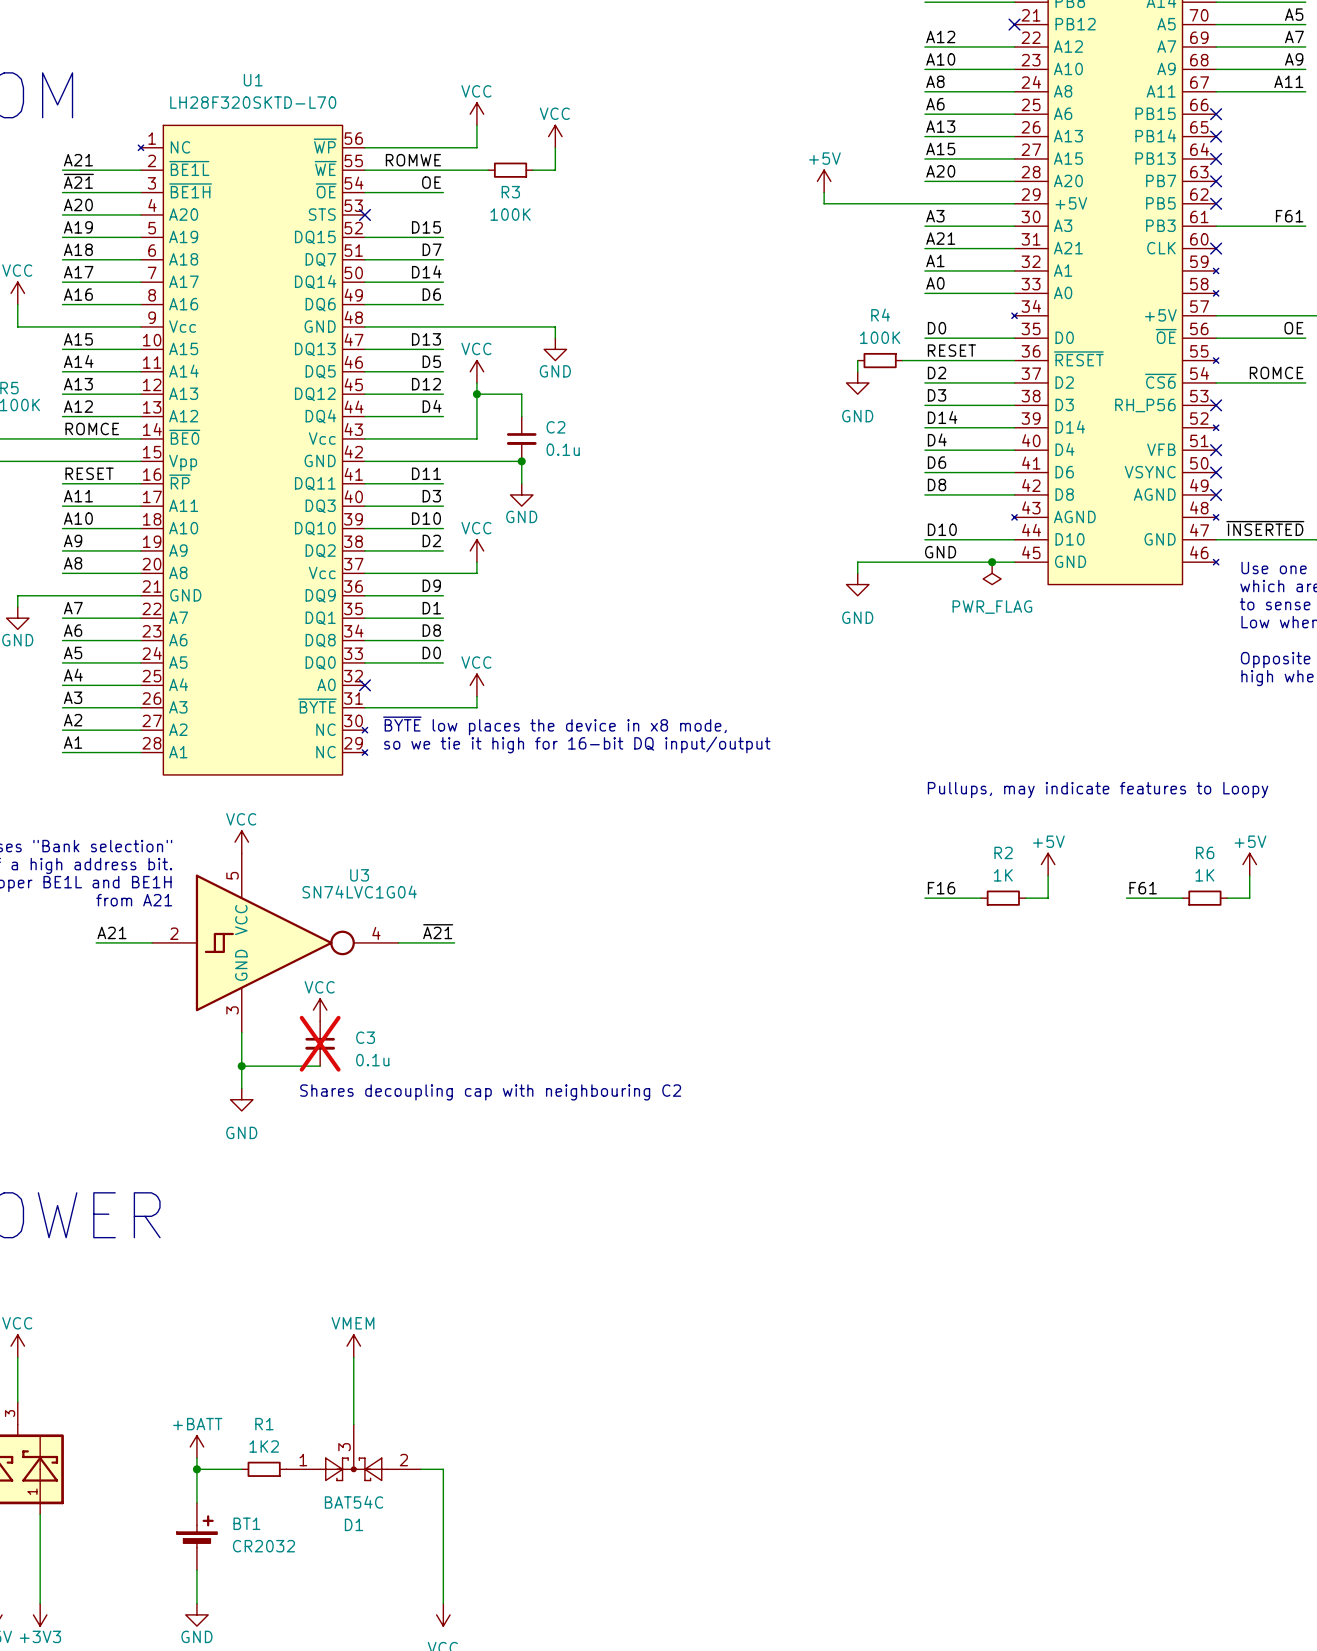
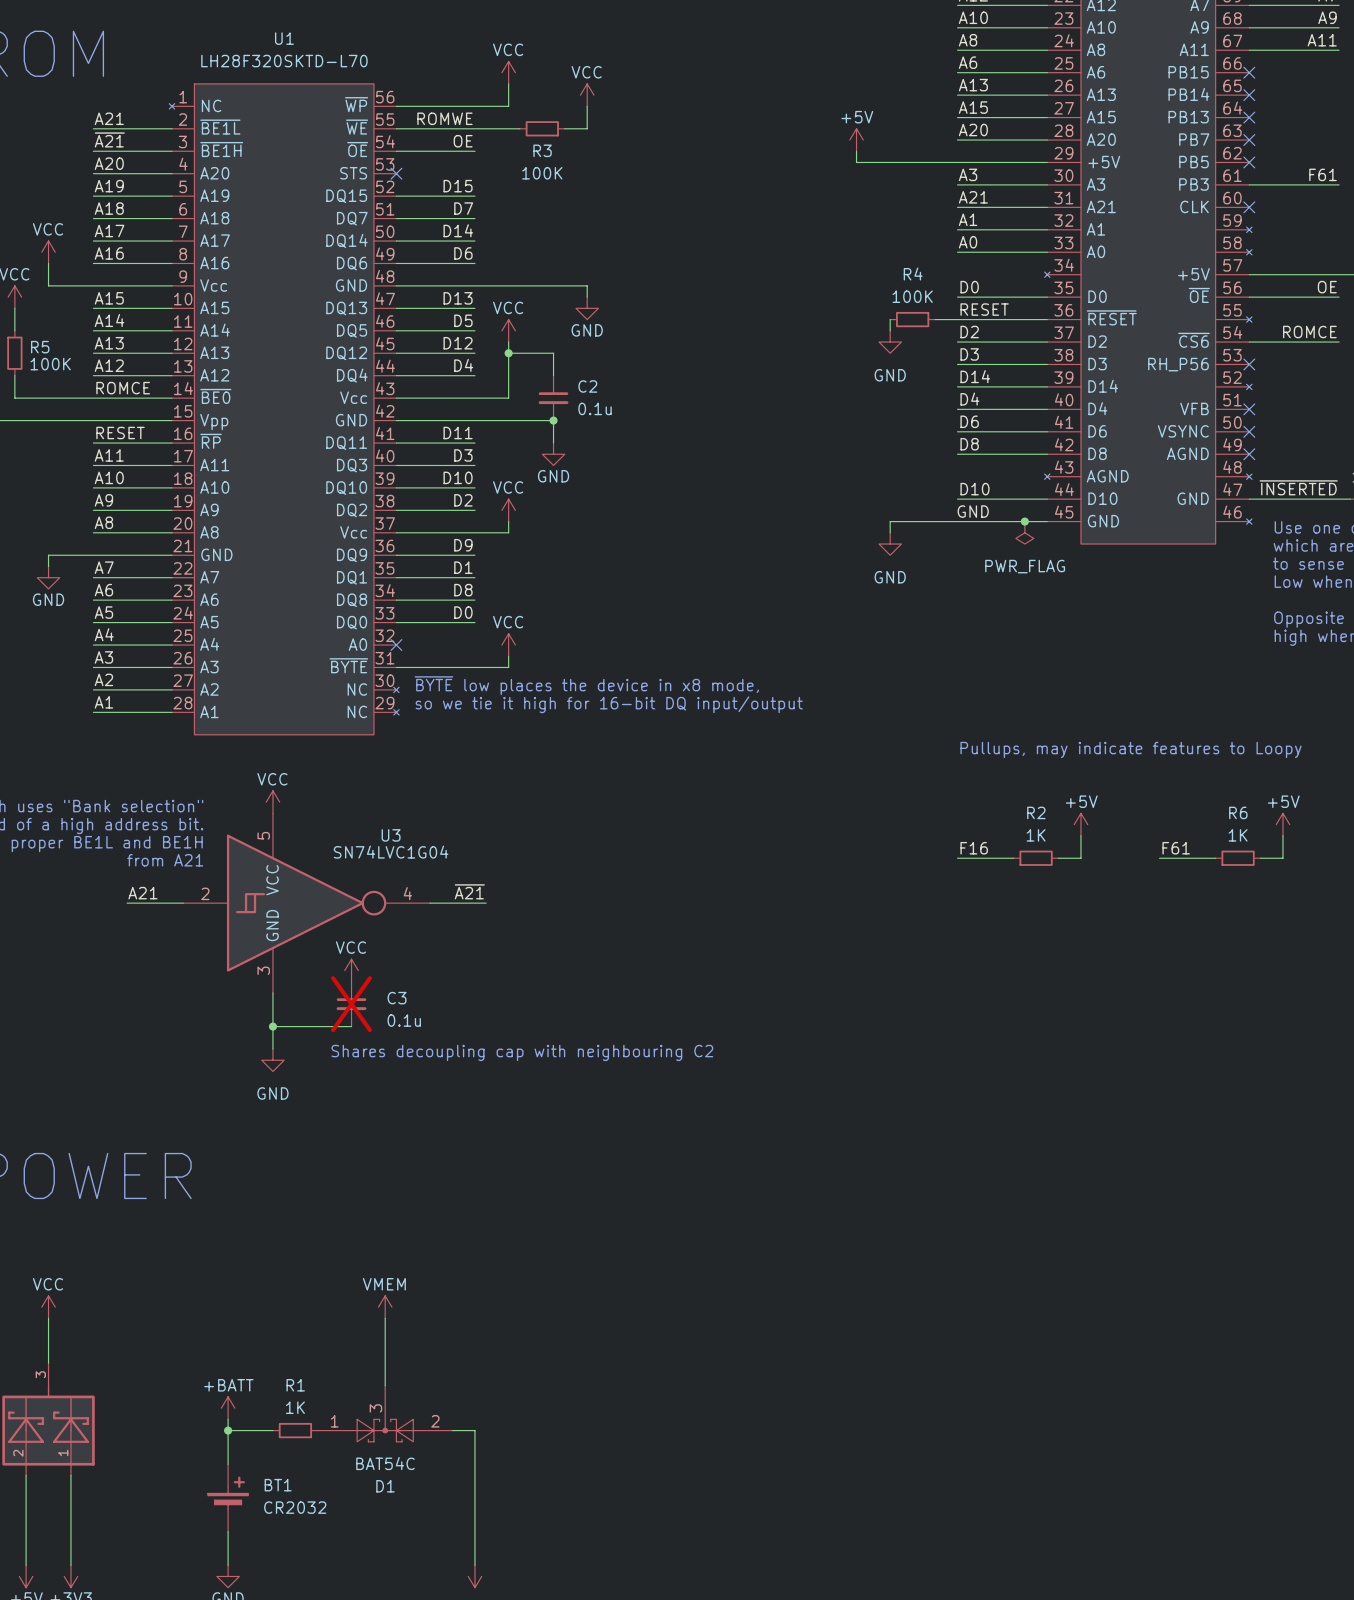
R1 value: 1K2 (264, 1446) -> 1K (295, 1407)

